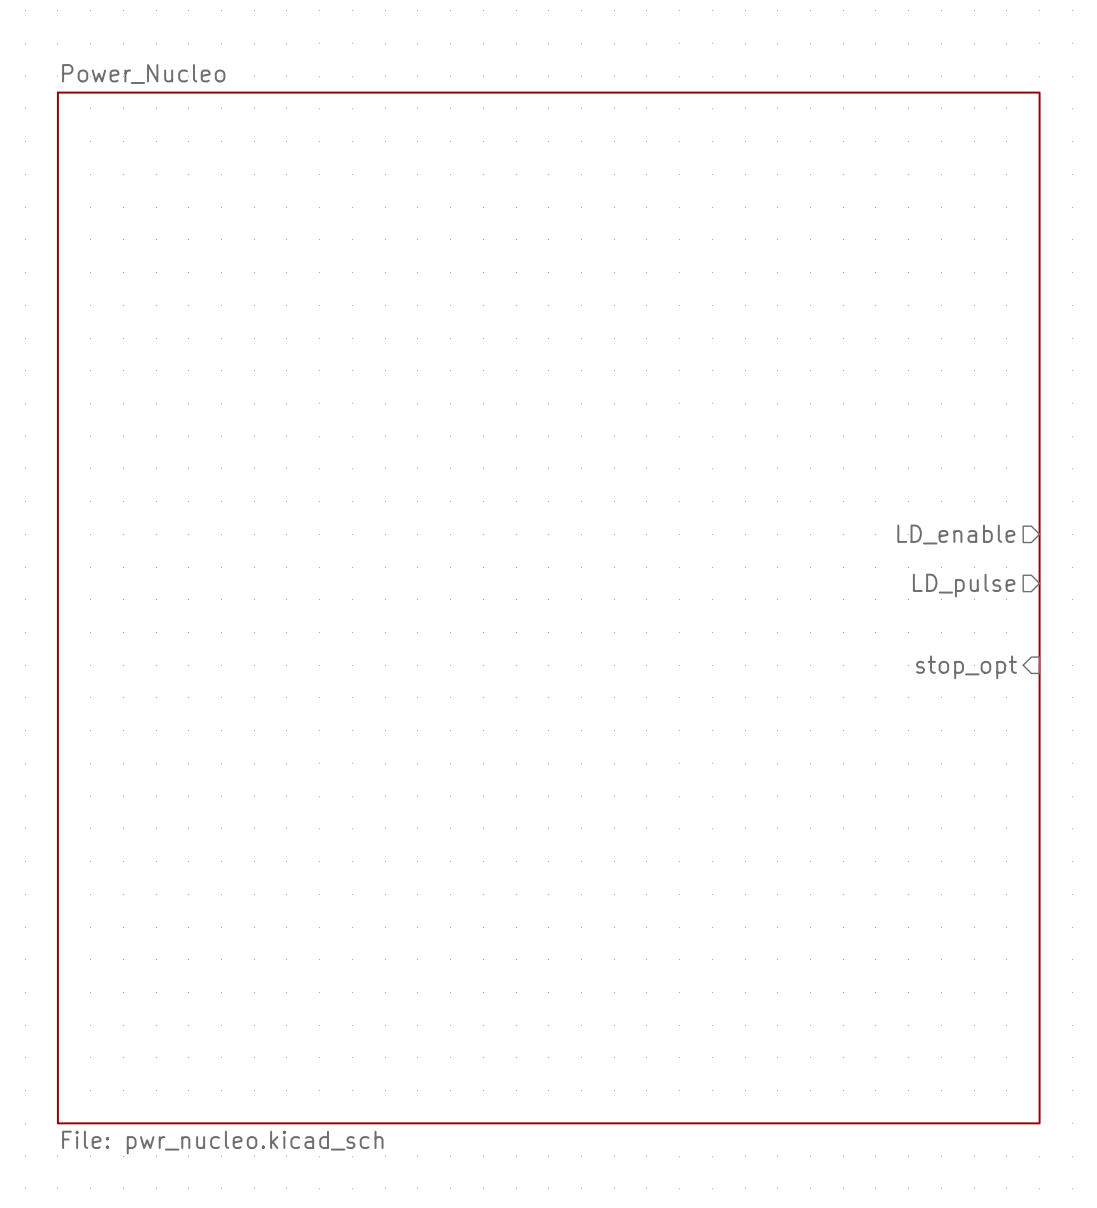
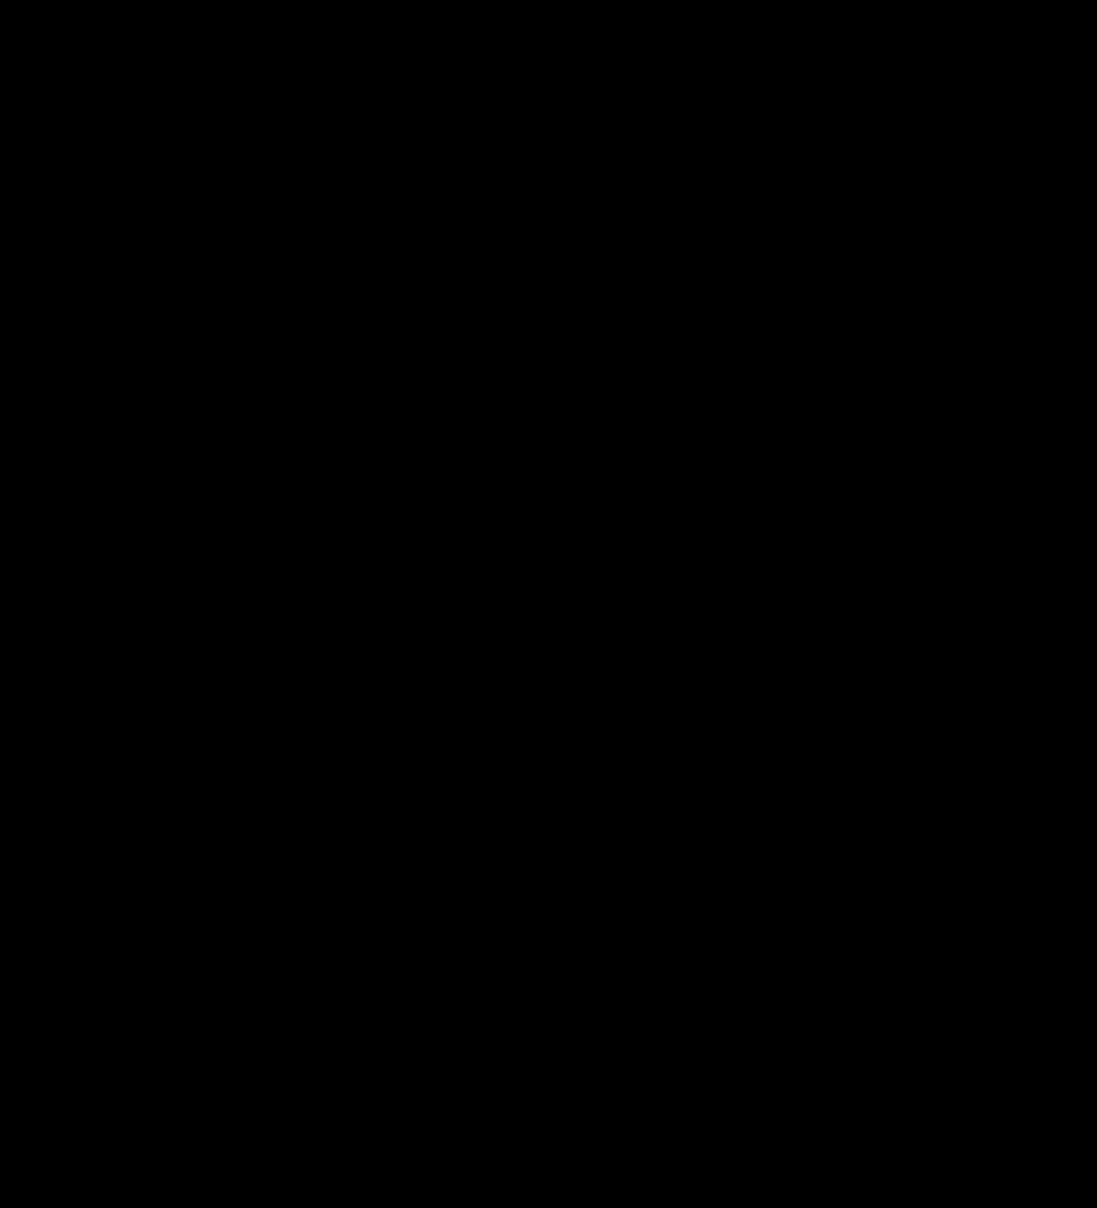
sheet pin: LD_enable (956, 534) -> none
sheet pin: LD_pulse (964, 585) -> none
sheet Power_Nucleo: File: pwr_nucleo.kicad_sch (548, 607) -> none
sheet pin: stop_opt (966, 667) -> none

